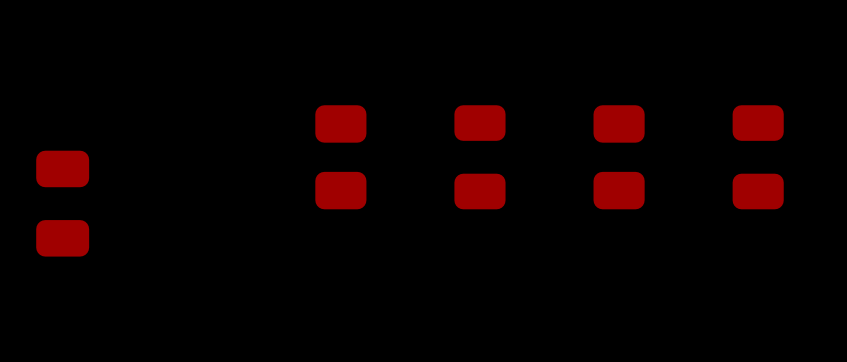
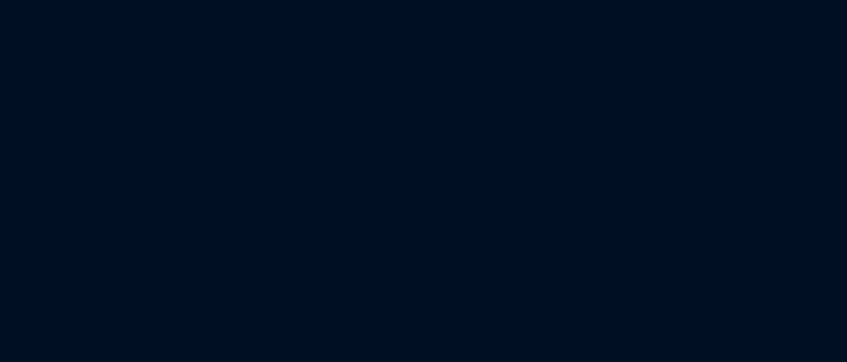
part: (340, 157) -> none
part: (479, 157) -> none
part: (619, 157) -> none
part: (758, 157) -> none
part: (62, 203) -> none

